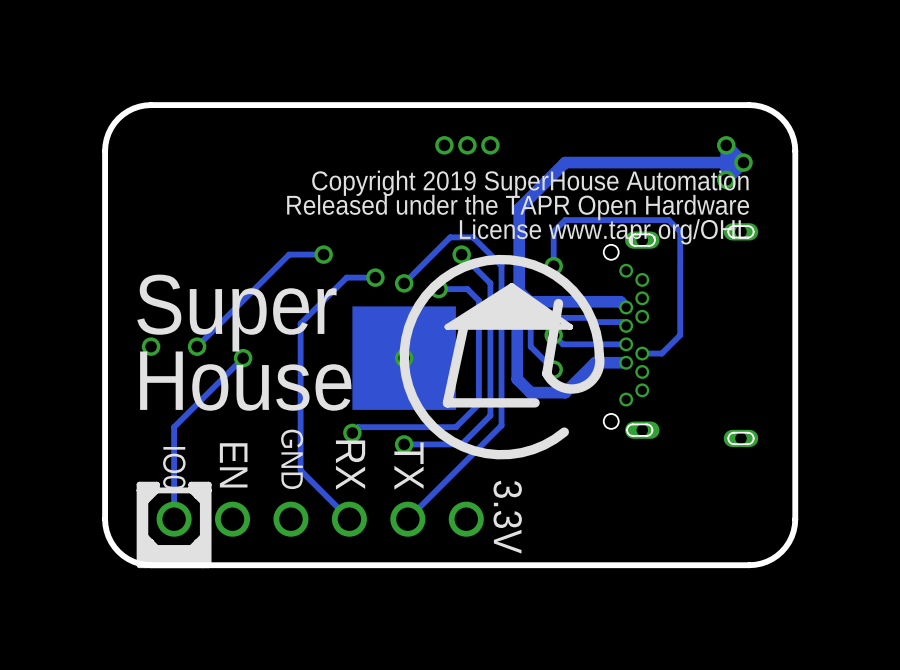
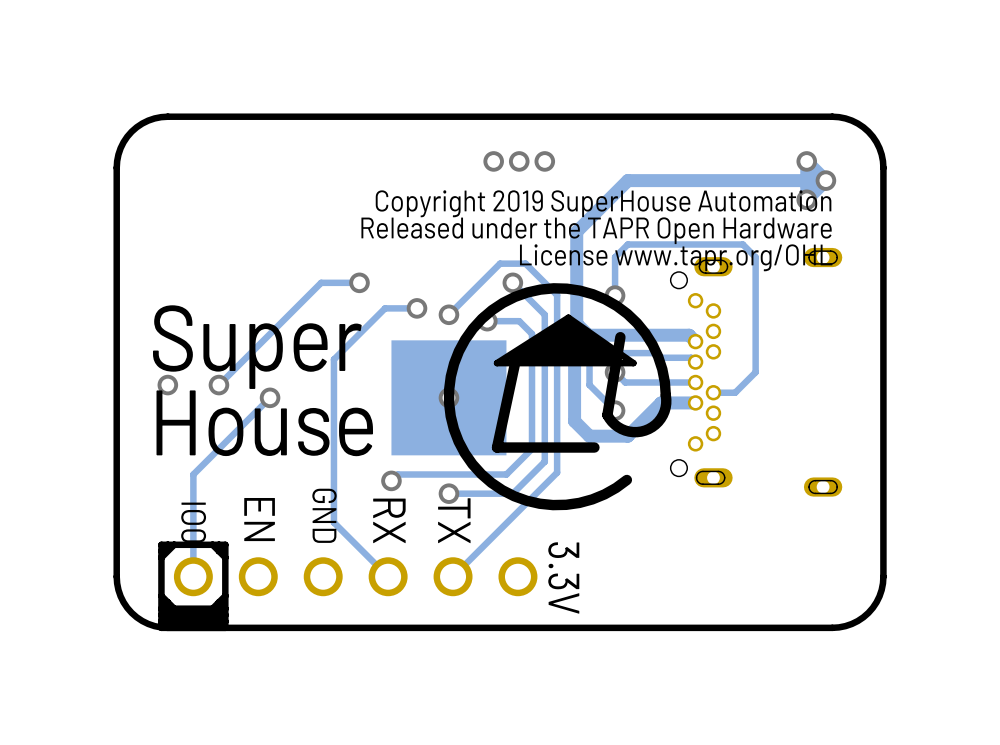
line: (156, 490) (156, 484) (139, 484) (139, 565) (145, 565) -> none
line: (191, 490) (191, 484) (208, 484) (208, 565) (202, 565) -> none

